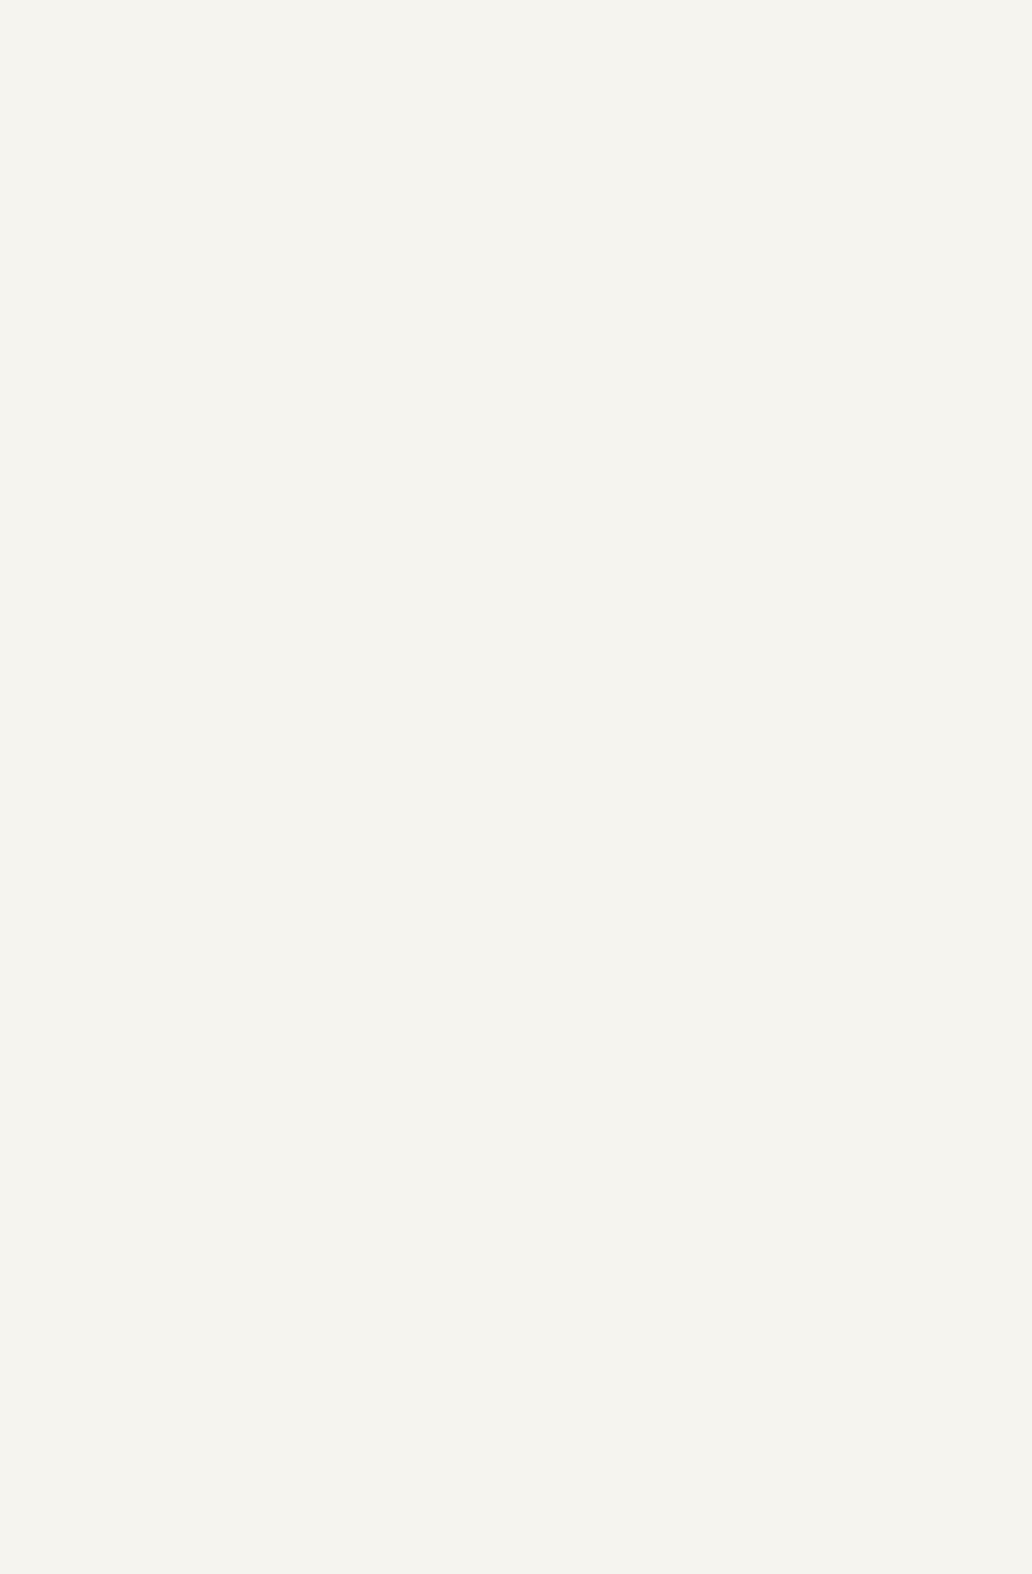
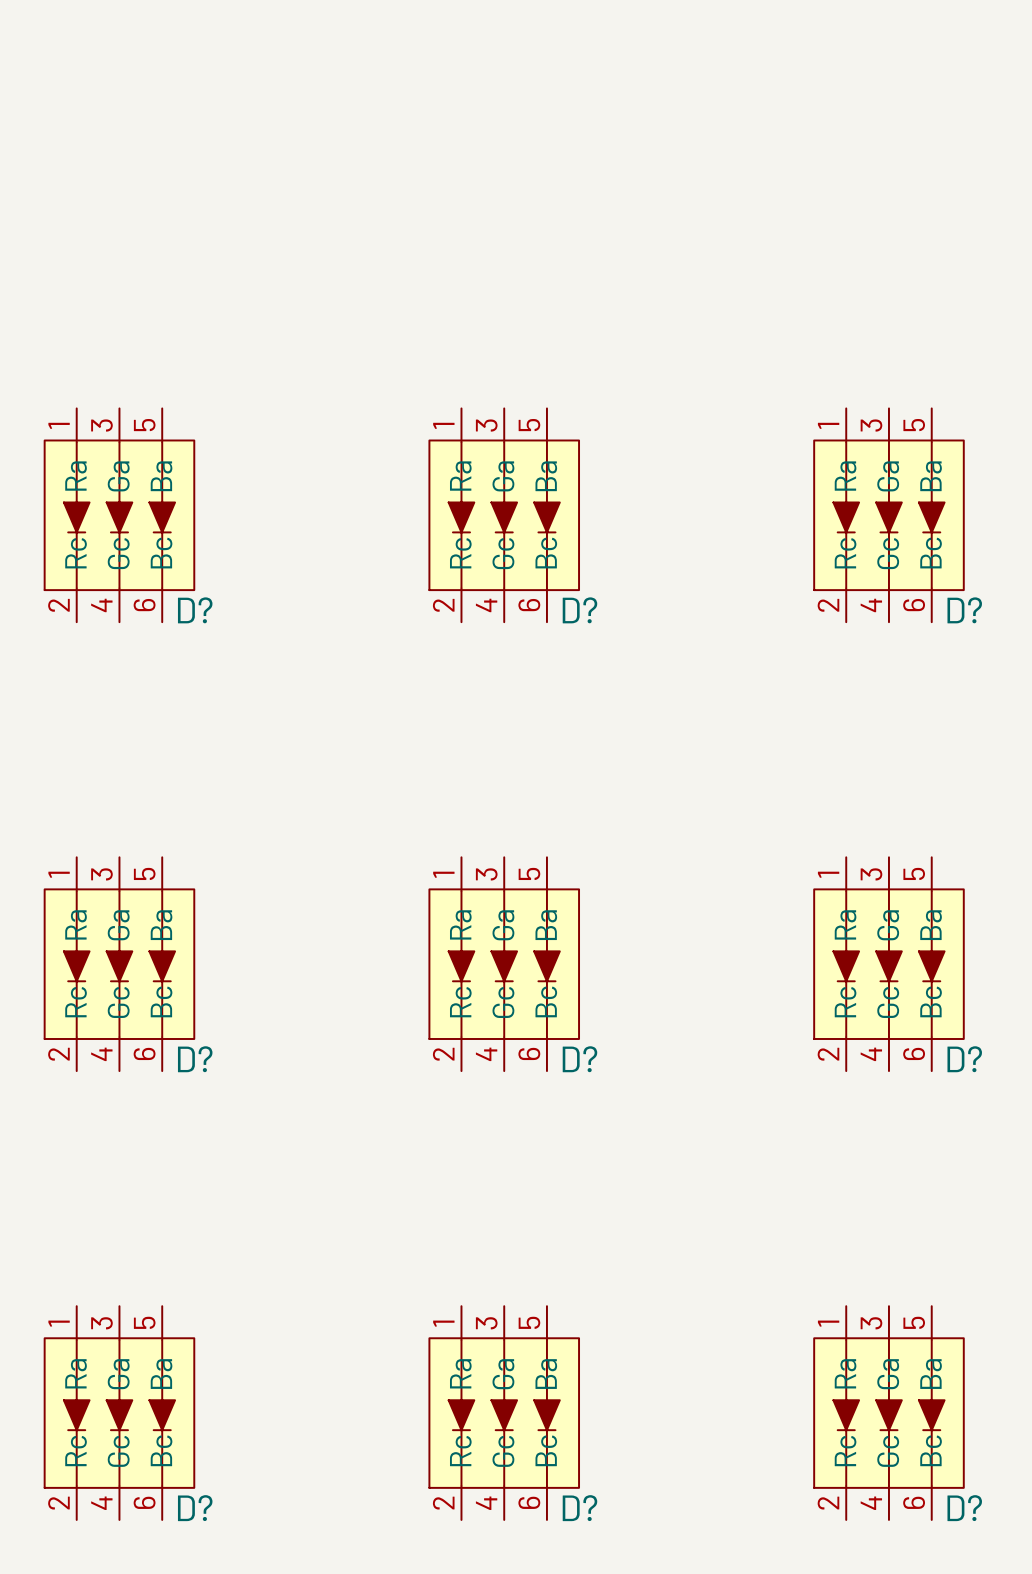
D?: none -> (119, 515)
D?: none -> (504, 515)
D?: none -> (888, 515)
D?: none -> (119, 964)
D?: none -> (504, 964)
D?: none -> (888, 964)
D?: none -> (119, 1413)
D?: none -> (504, 1413)
D?: none -> (888, 1413)

